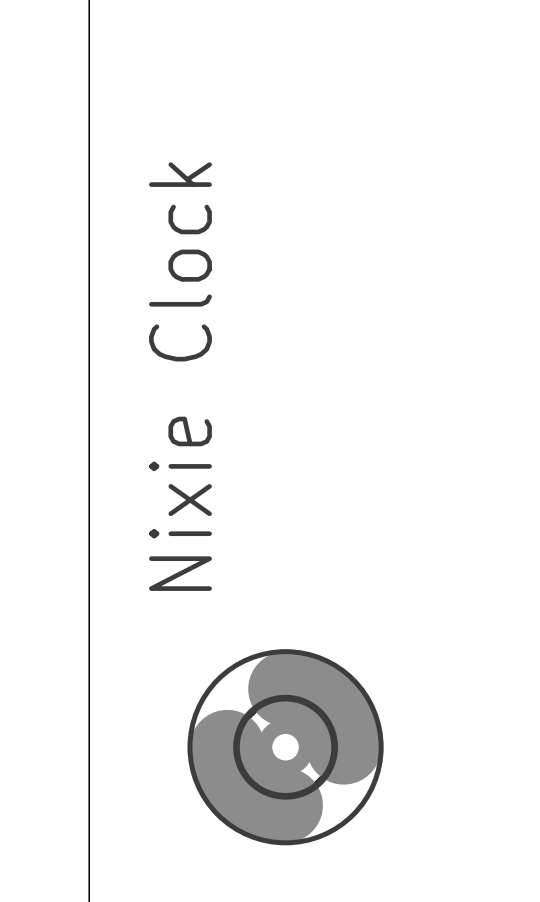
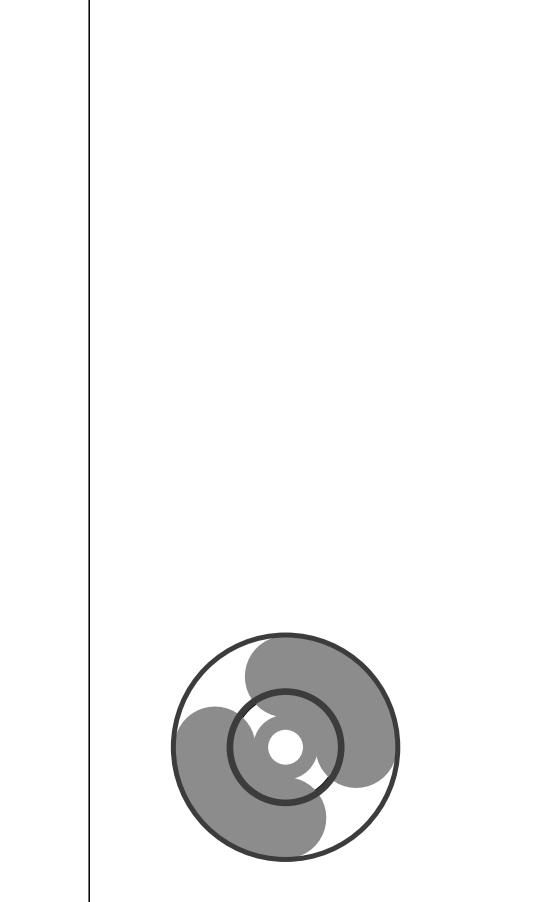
text: Nixie Clock (180, 376) -> none
part footprint: [187, 649, 384, 846] -> [170, 632, 401, 862]

